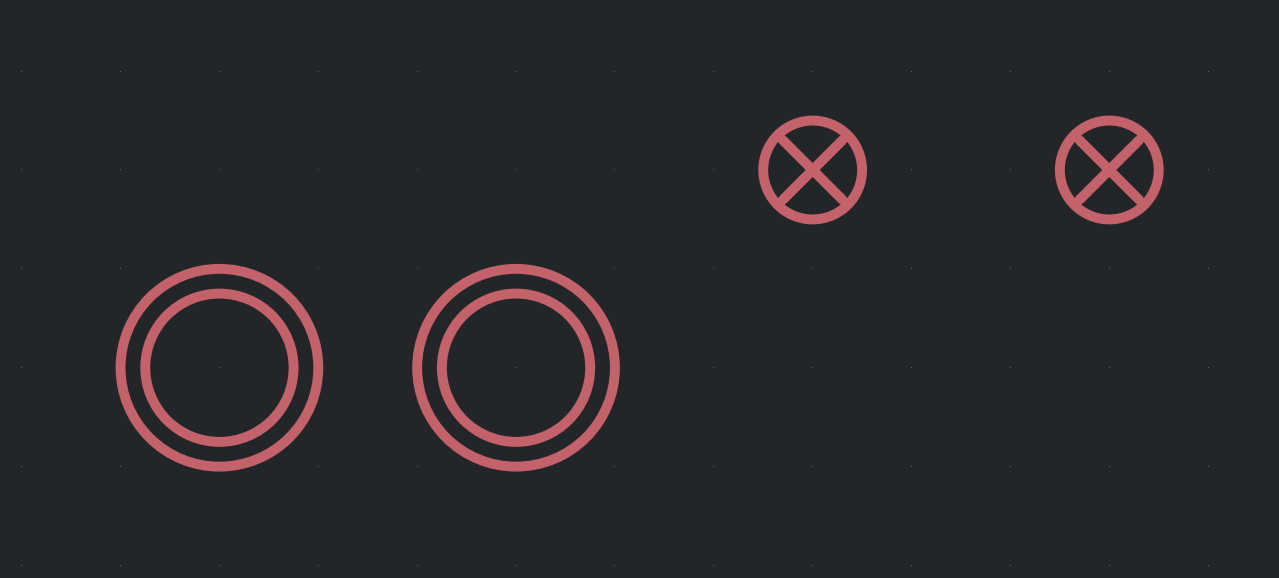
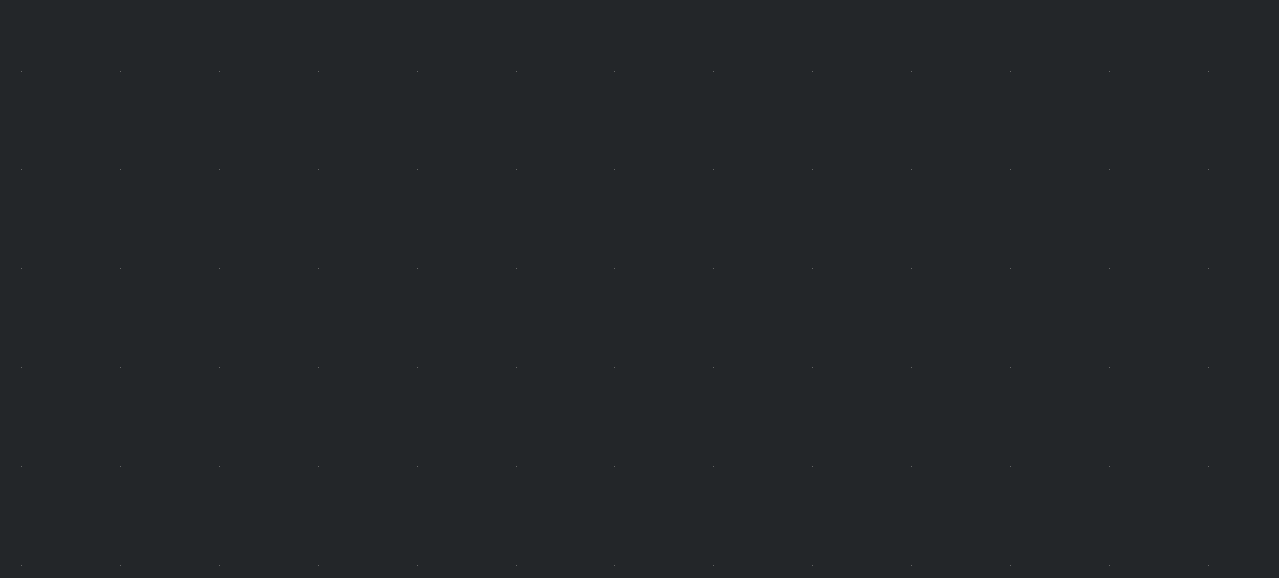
part: (812, 169) -> none
part: (1109, 169) -> none
part: (219, 367) -> none
part: (516, 367) -> none

